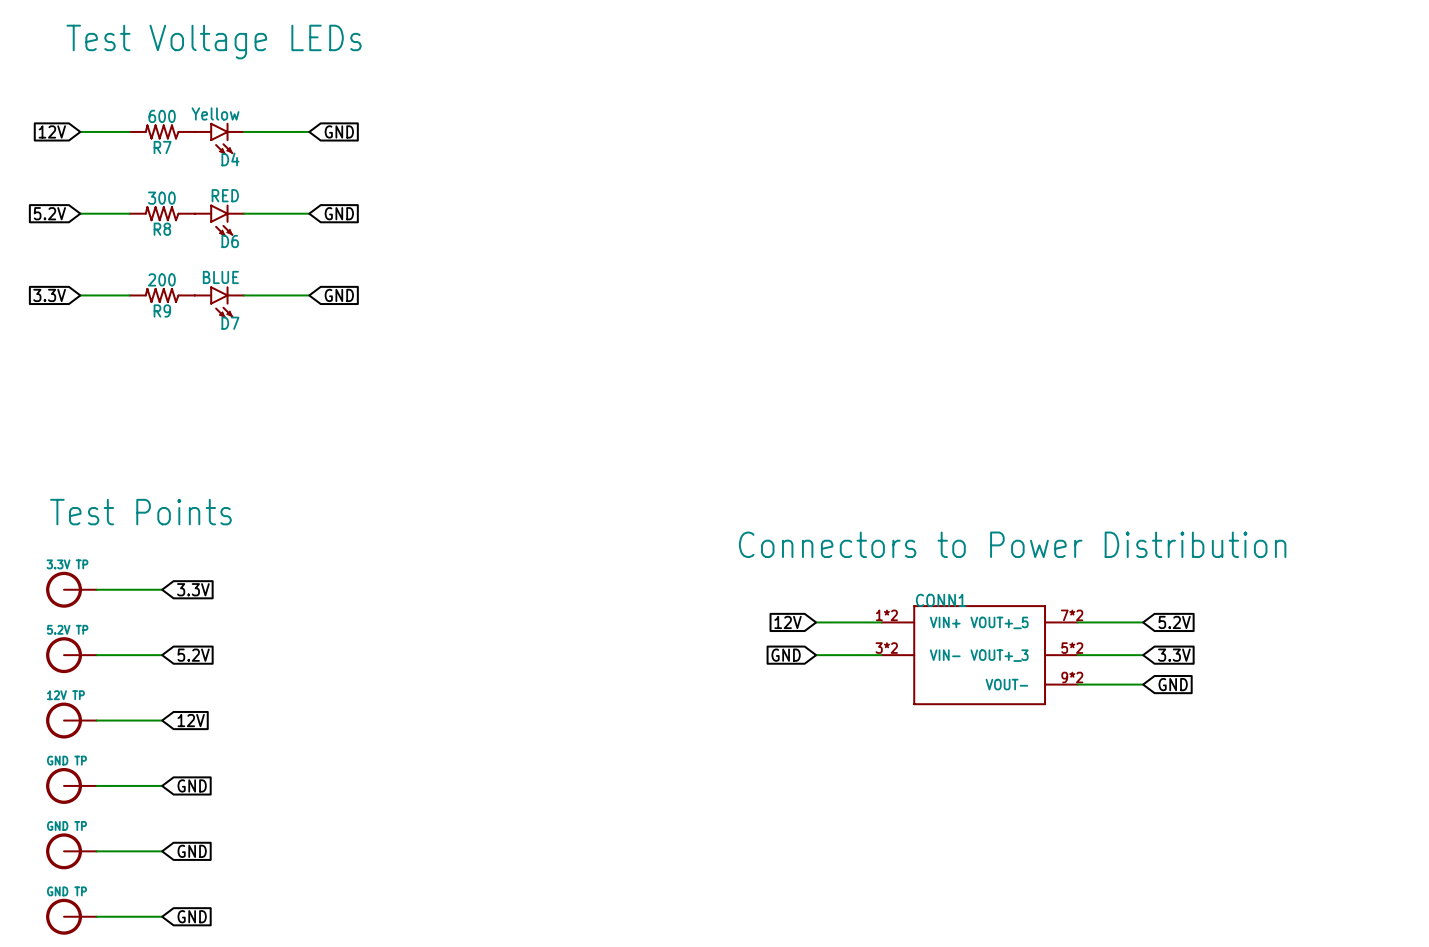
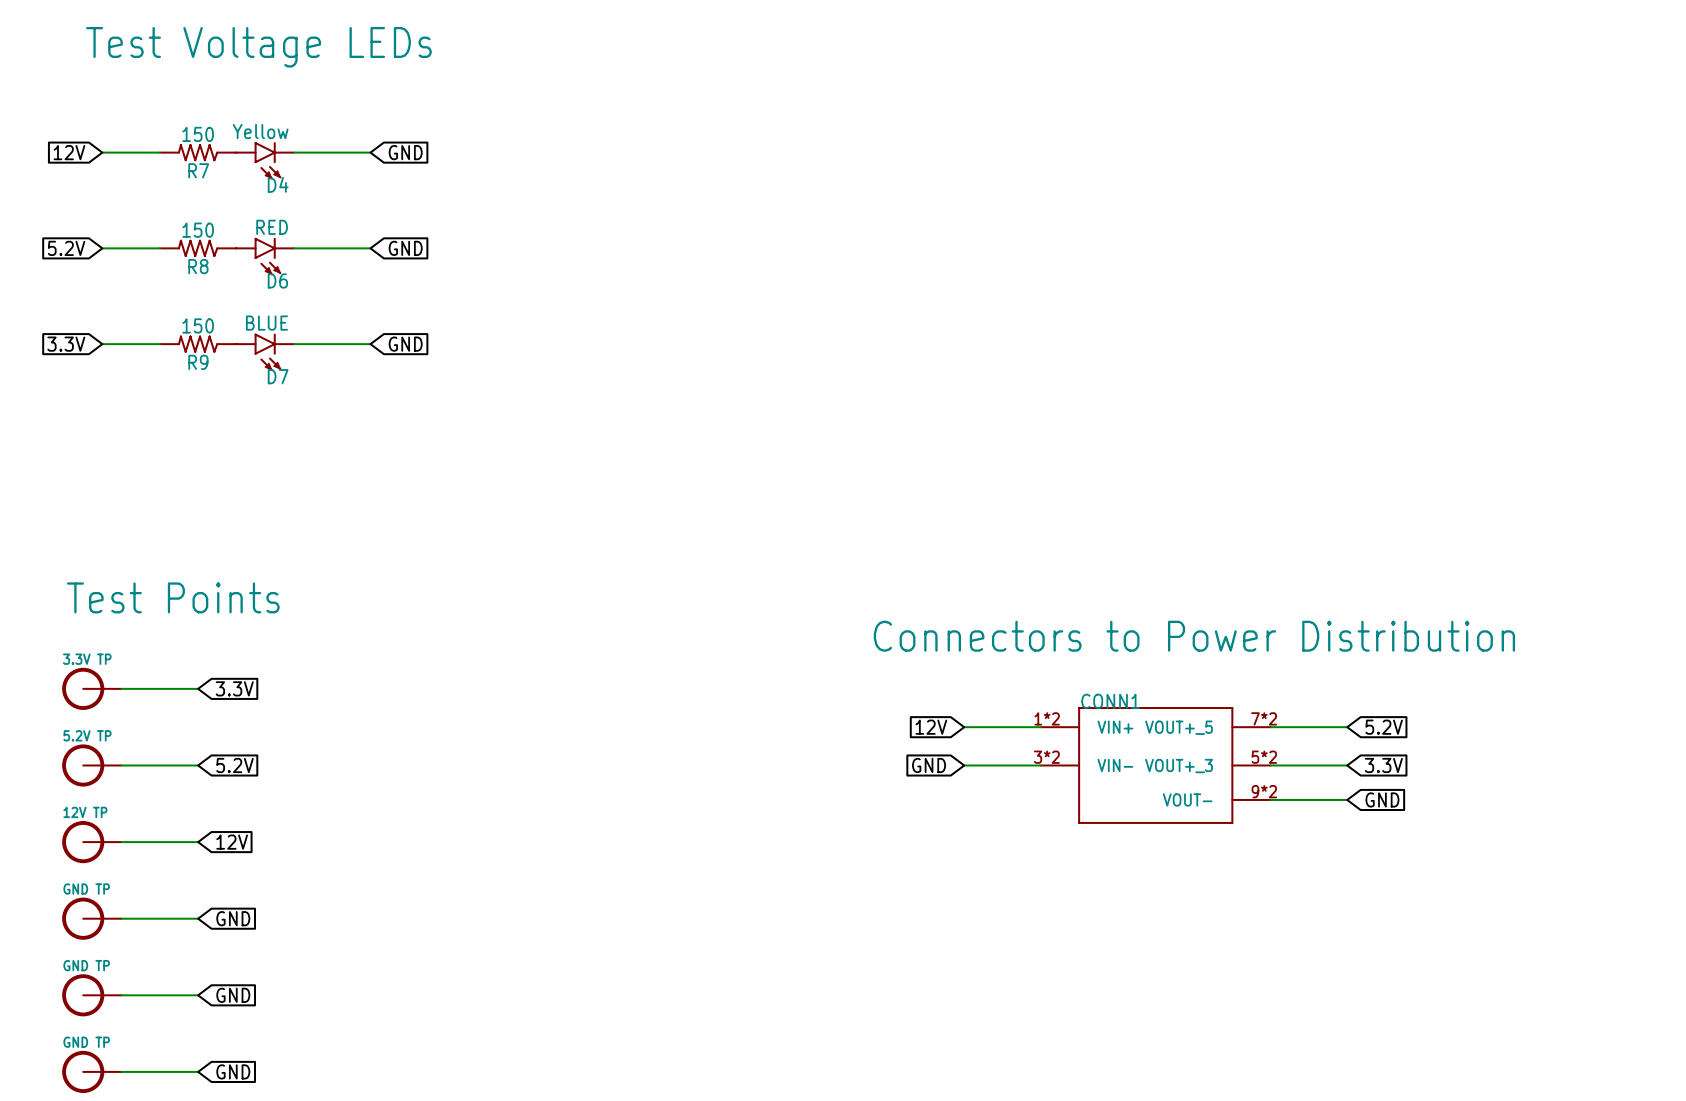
R7 value: 600 (162, 116) -> 150 (198, 134)
R8 value: 300 (161, 198) -> 150 (198, 230)
R9 value: 200 (161, 279) -> 150 (198, 325)

